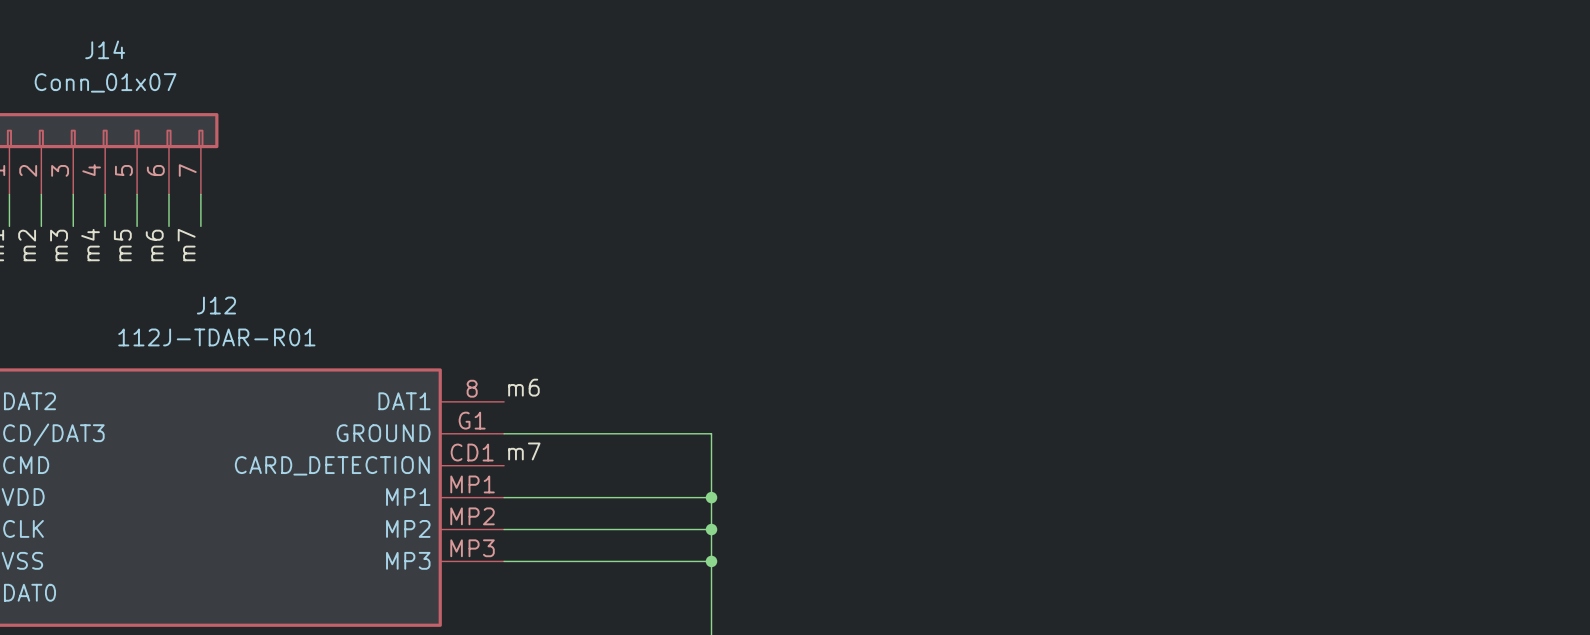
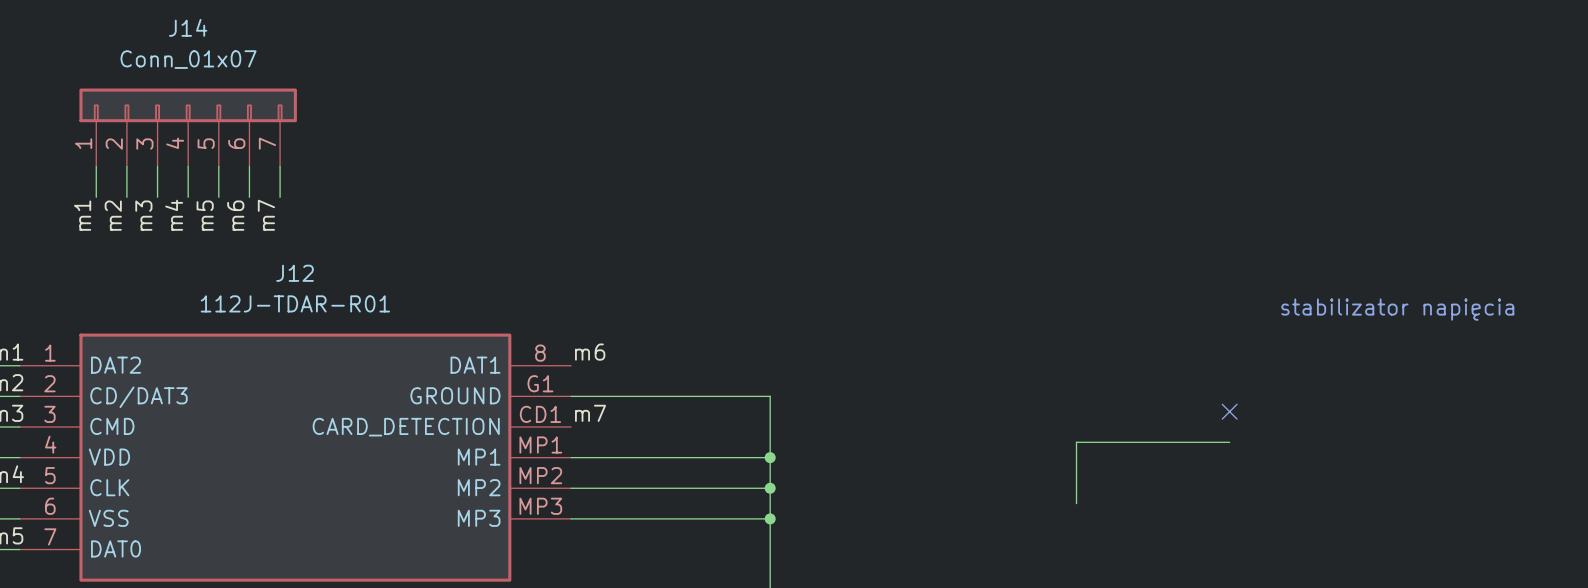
text: none -> stabilizator napięcia (1397, 309)
no-connect mark: none -> (1229, 411)
wire: none -> (1229, 442) (1076, 442) (1076, 503)

